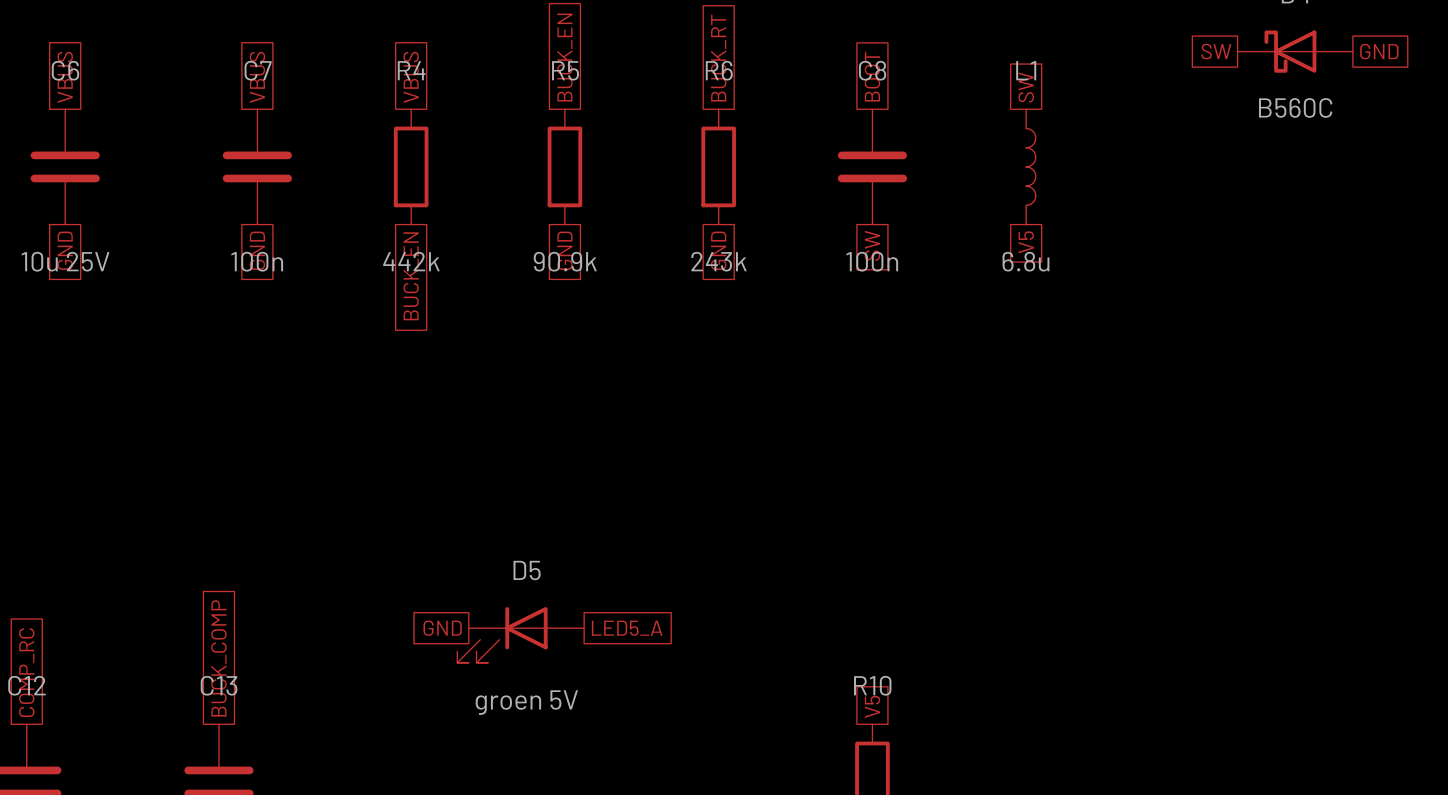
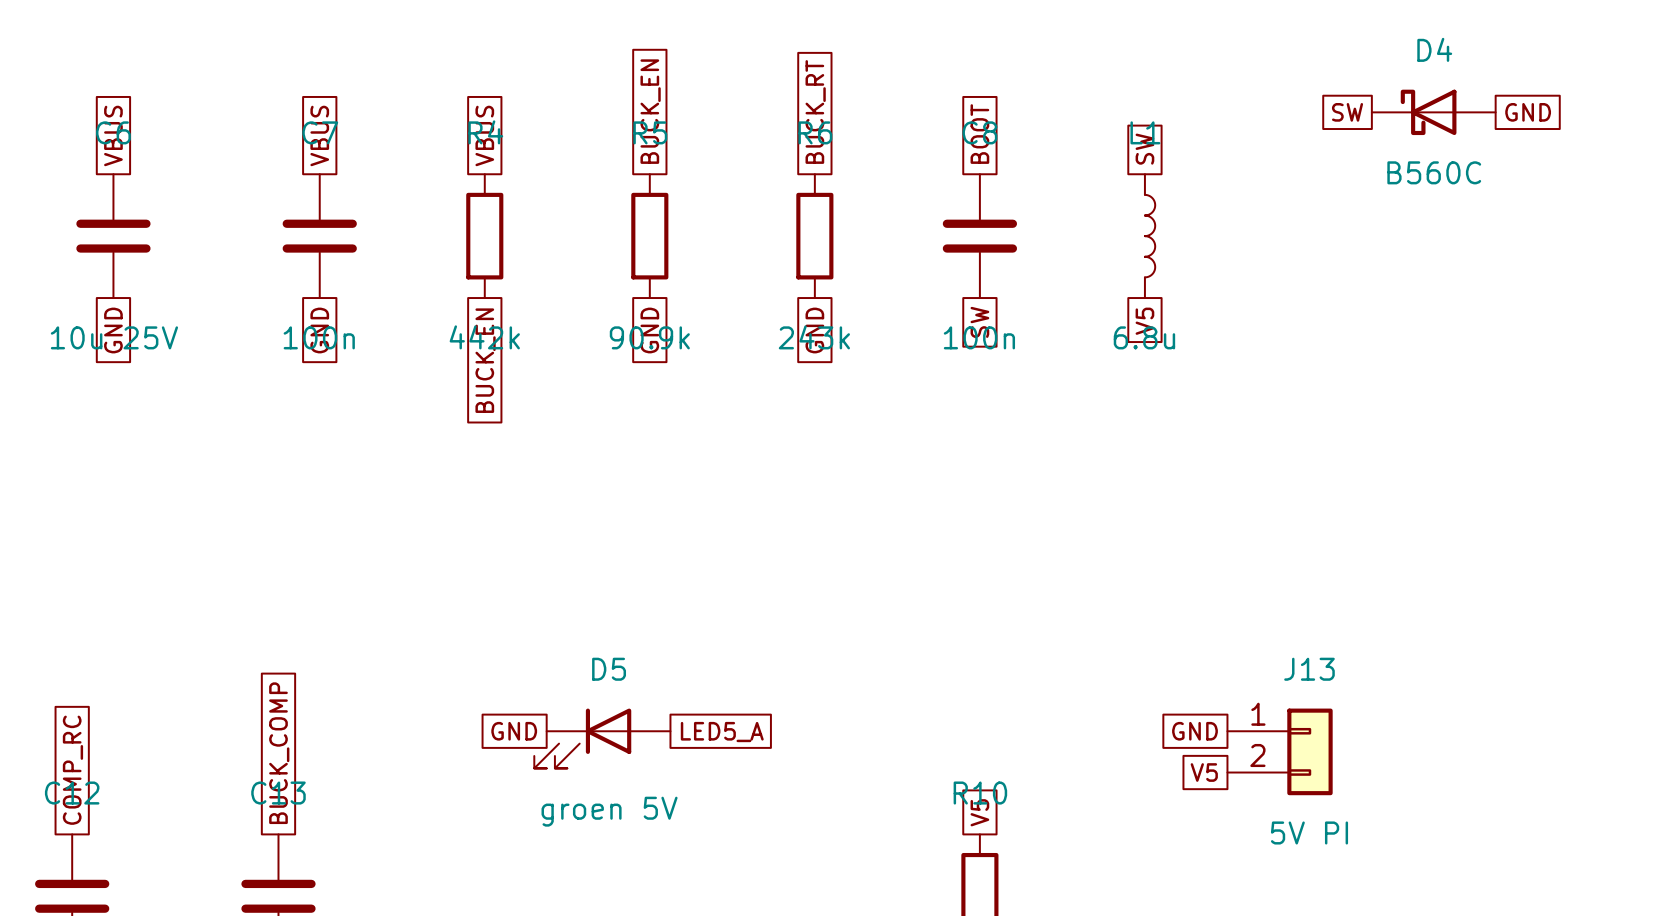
global label: none -> GND (1194, 731)
J13: none -> 5V PI (1280, 751)
global label: none -> V5 (1204, 772)

